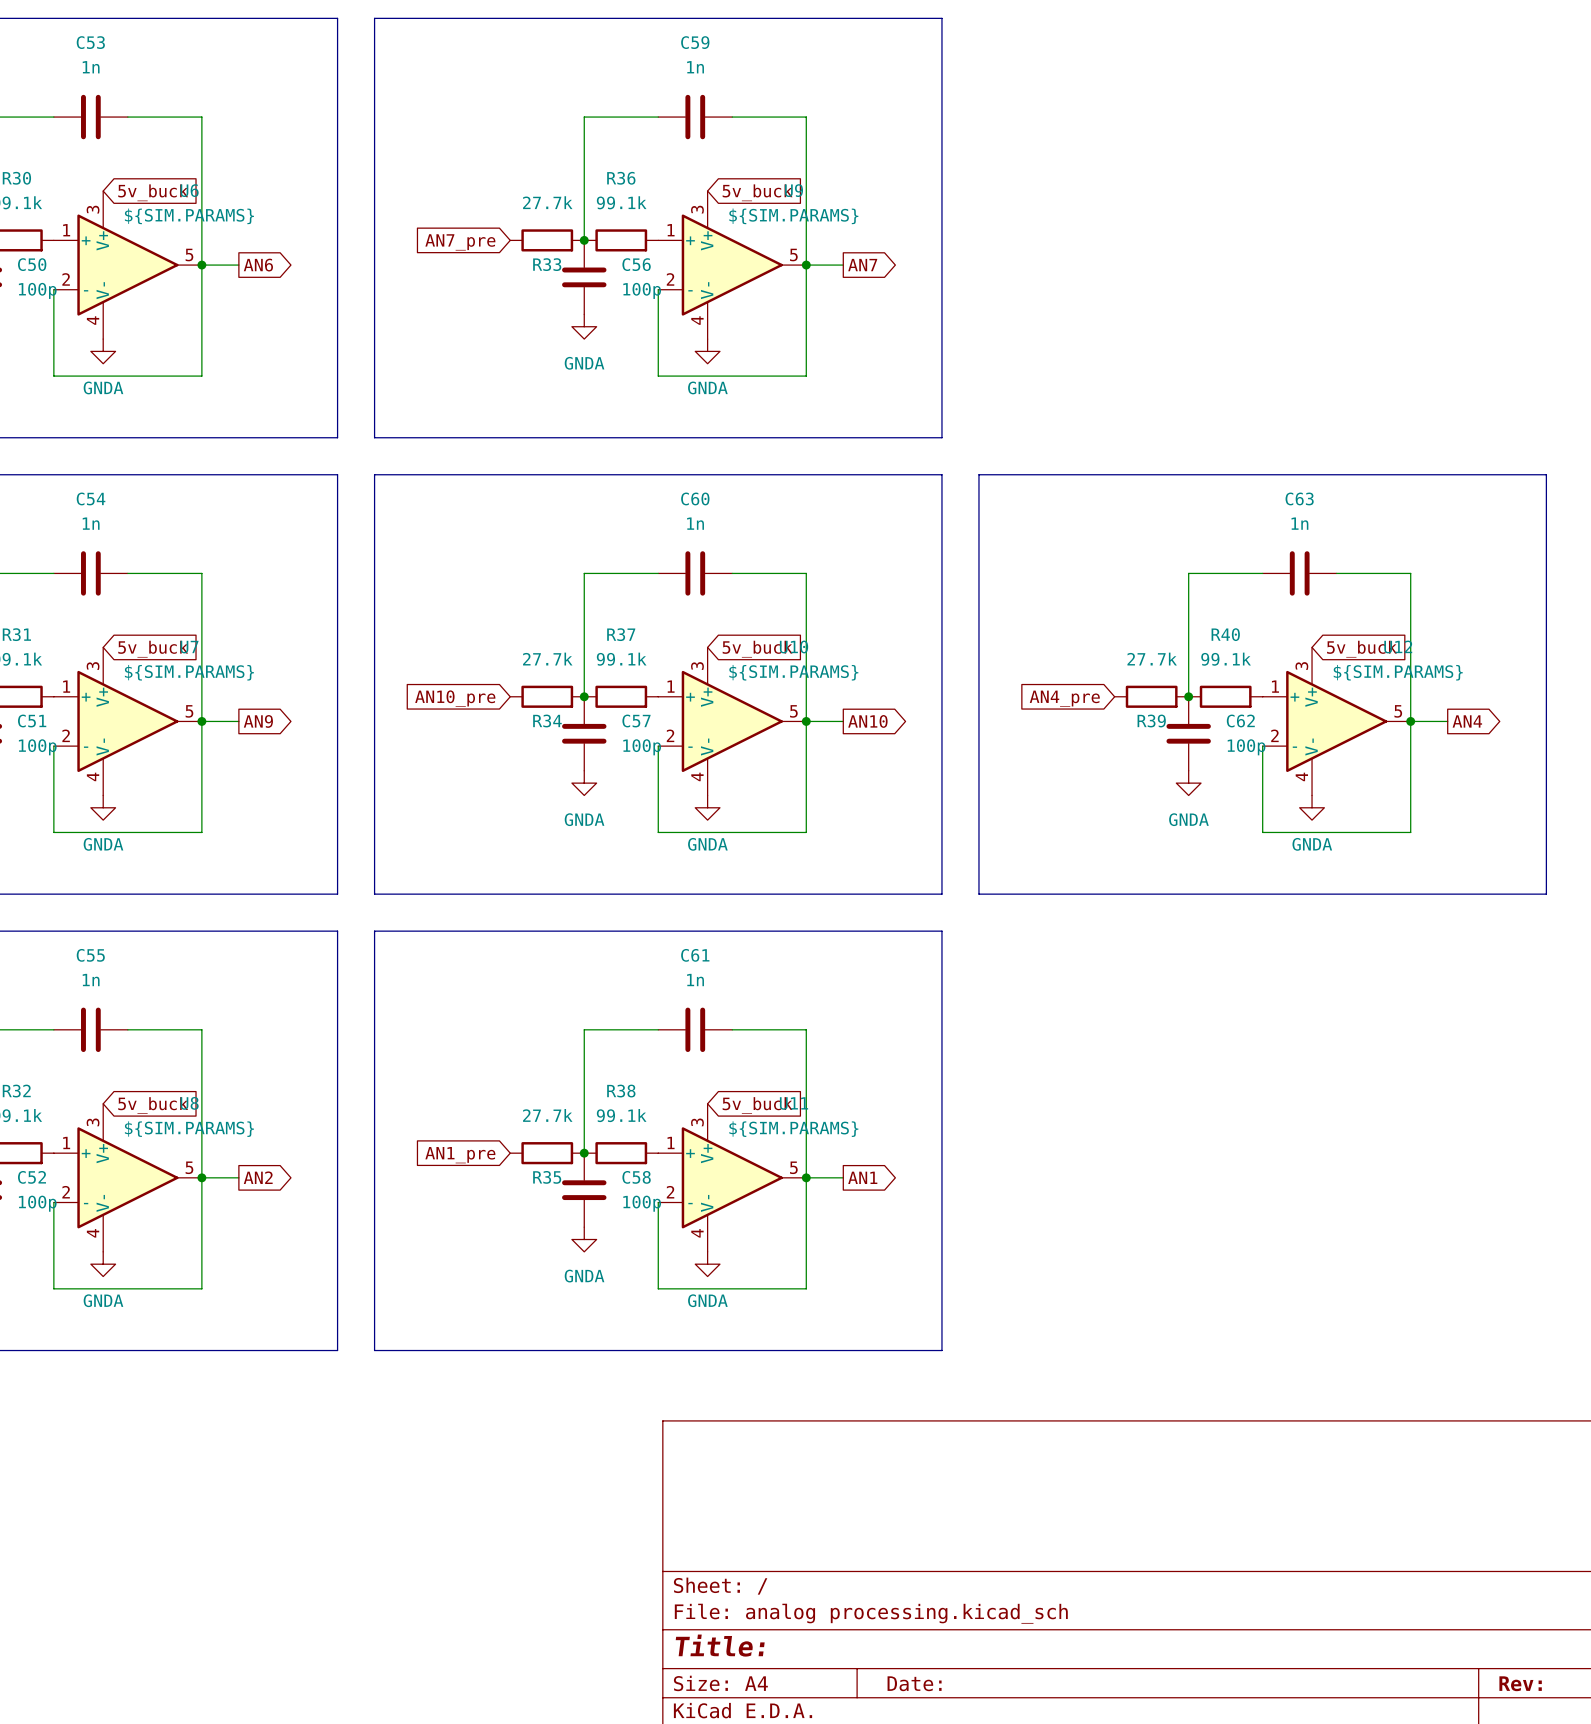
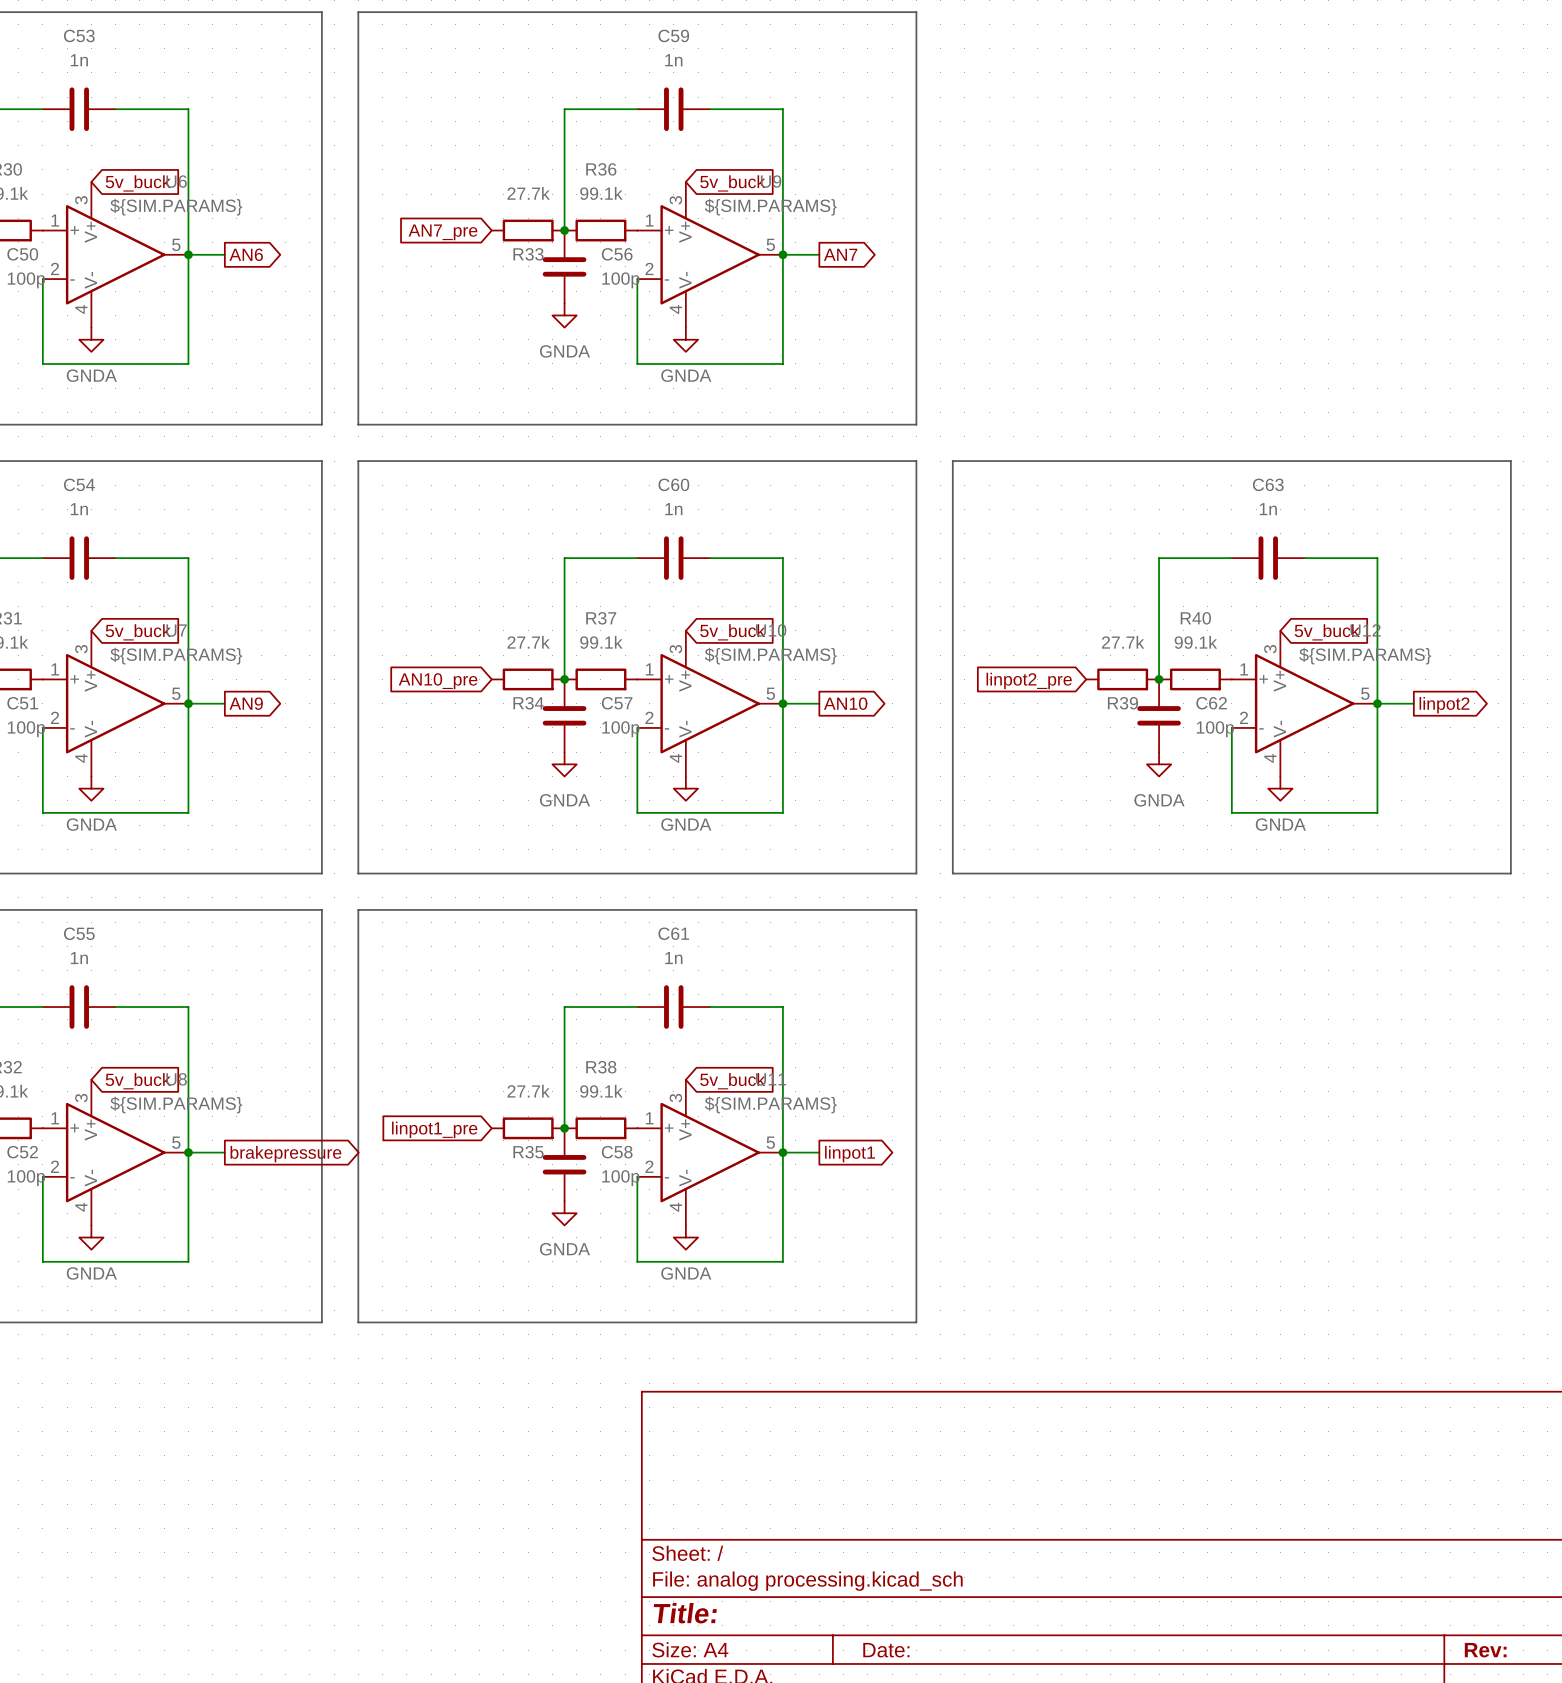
global label: AN4_pre (1064, 698) -> linpot2_pre (1029, 680)
global label: AN4 (1467, 721) -> linpot2 (1444, 705)
global label: AN1_pre (460, 1155) -> linpot1_pre (434, 1129)
global label: AN2 (258, 1177) -> brakepressure (285, 1154)
global label: AN1 (862, 1177) -> linpot1 (850, 1154)

